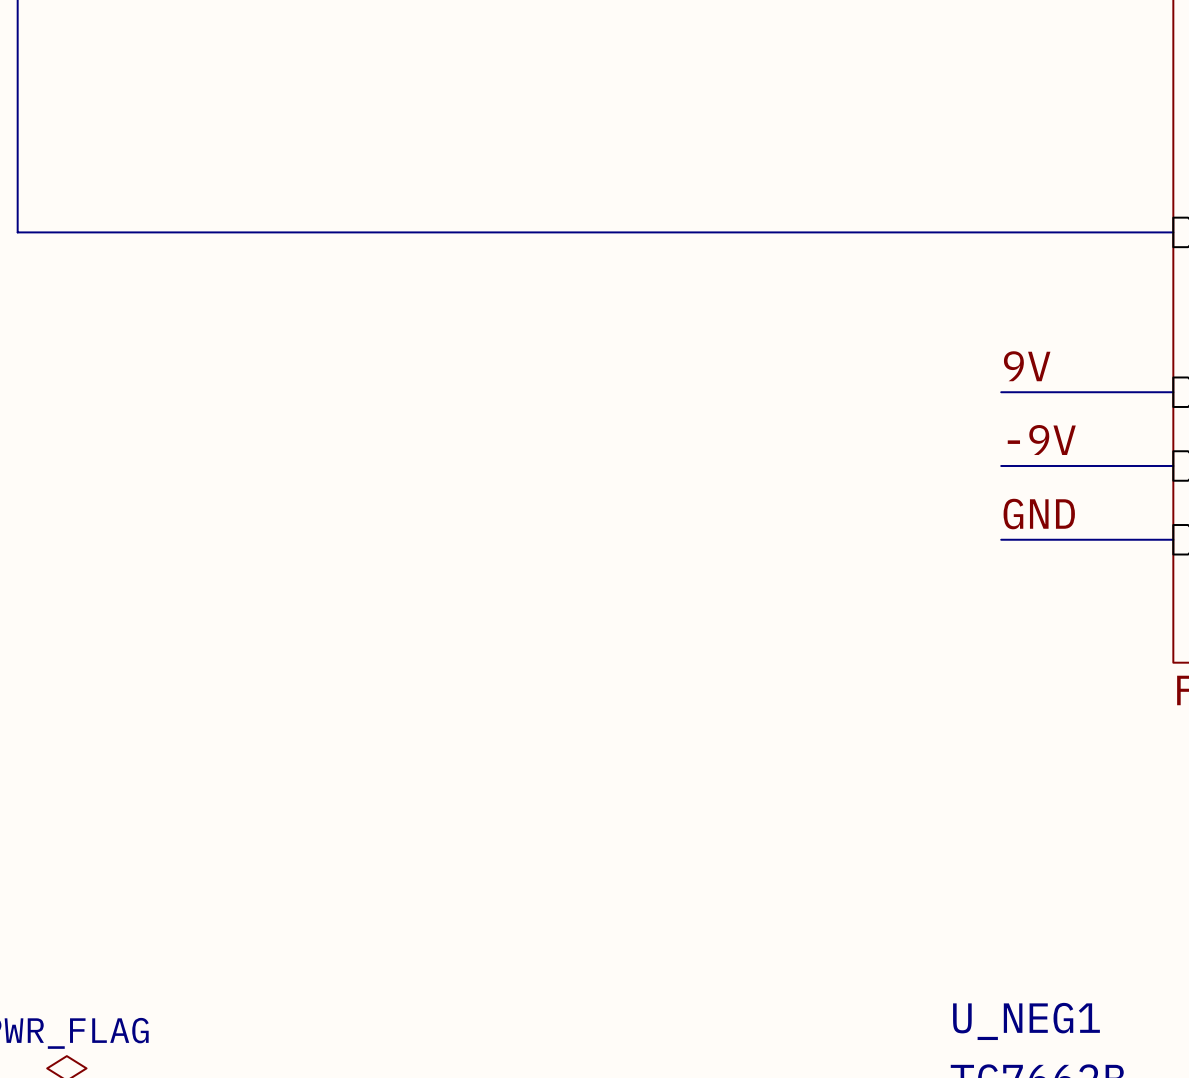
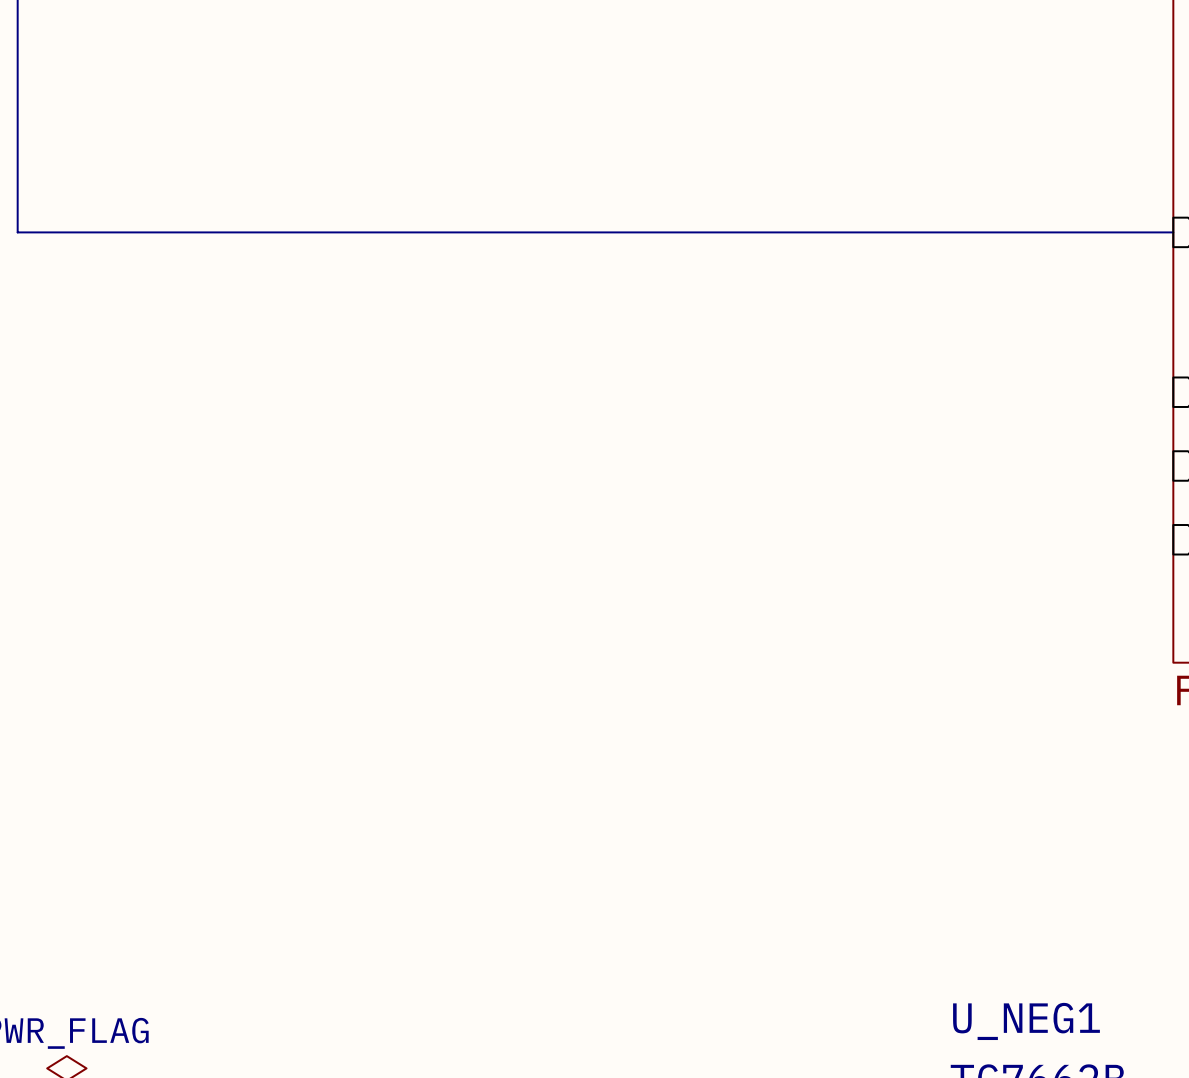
label: 9V (1027, 366) -> none
wire: (1001, 392) (1173, 392) -> none
label: -9V (1041, 440) -> none
wire: (1001, 465) (1173, 465) -> none
label: GND (1039, 514) -> none
wire: (1001, 539) (1173, 539) -> none

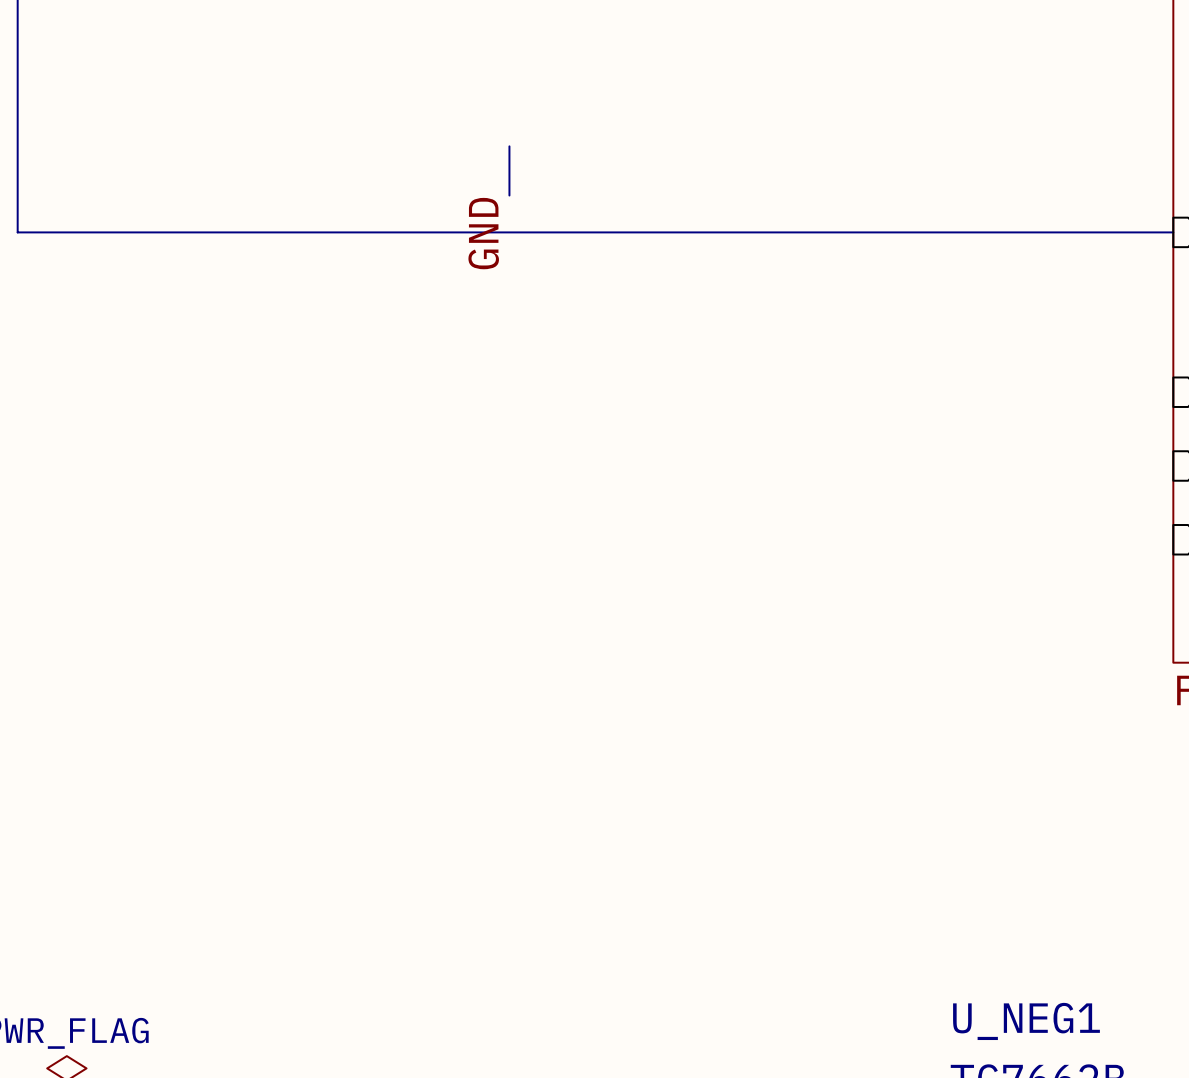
wire: none -> (509, 146) (509, 195)
label: none -> GND (483, 233)

